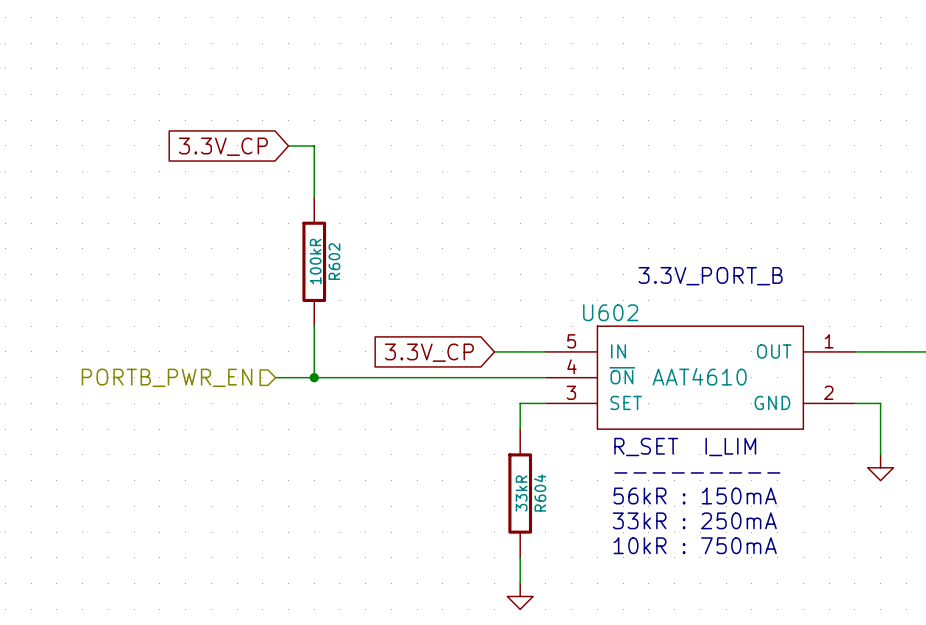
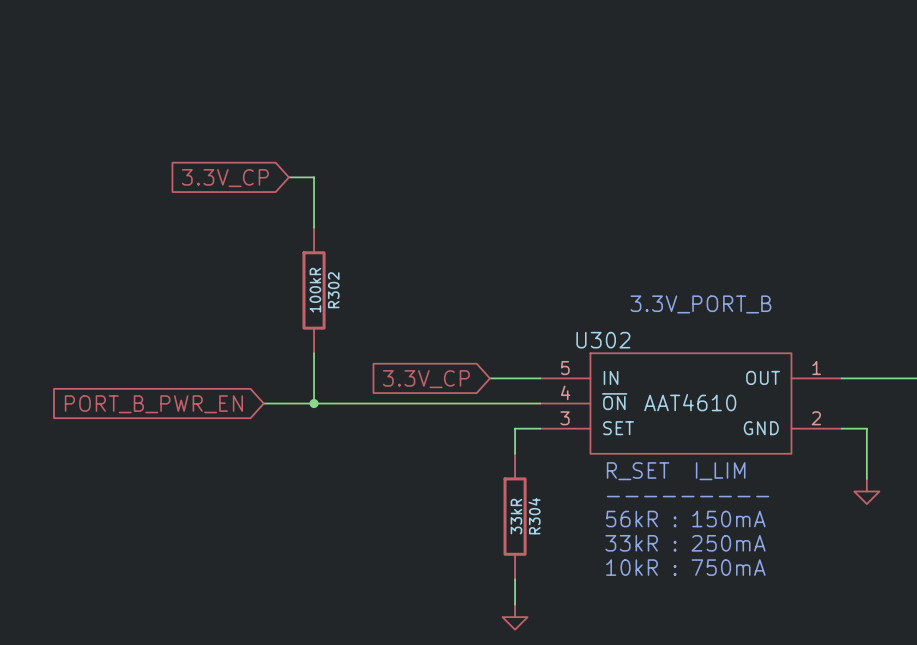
R602 name: R602 (334, 261) -> R302 (333, 290)
U602 name: U602 (610, 312) -> U302 (603, 340)
hierarchical label: PORTB_PWR_EN (167, 377) -> none
wire: none -> (263, 403) (276, 403)
global label: none -> PORT_B_PWR_EN (153, 404)
R604 name: R604 (540, 493) -> R304 (534, 516)

